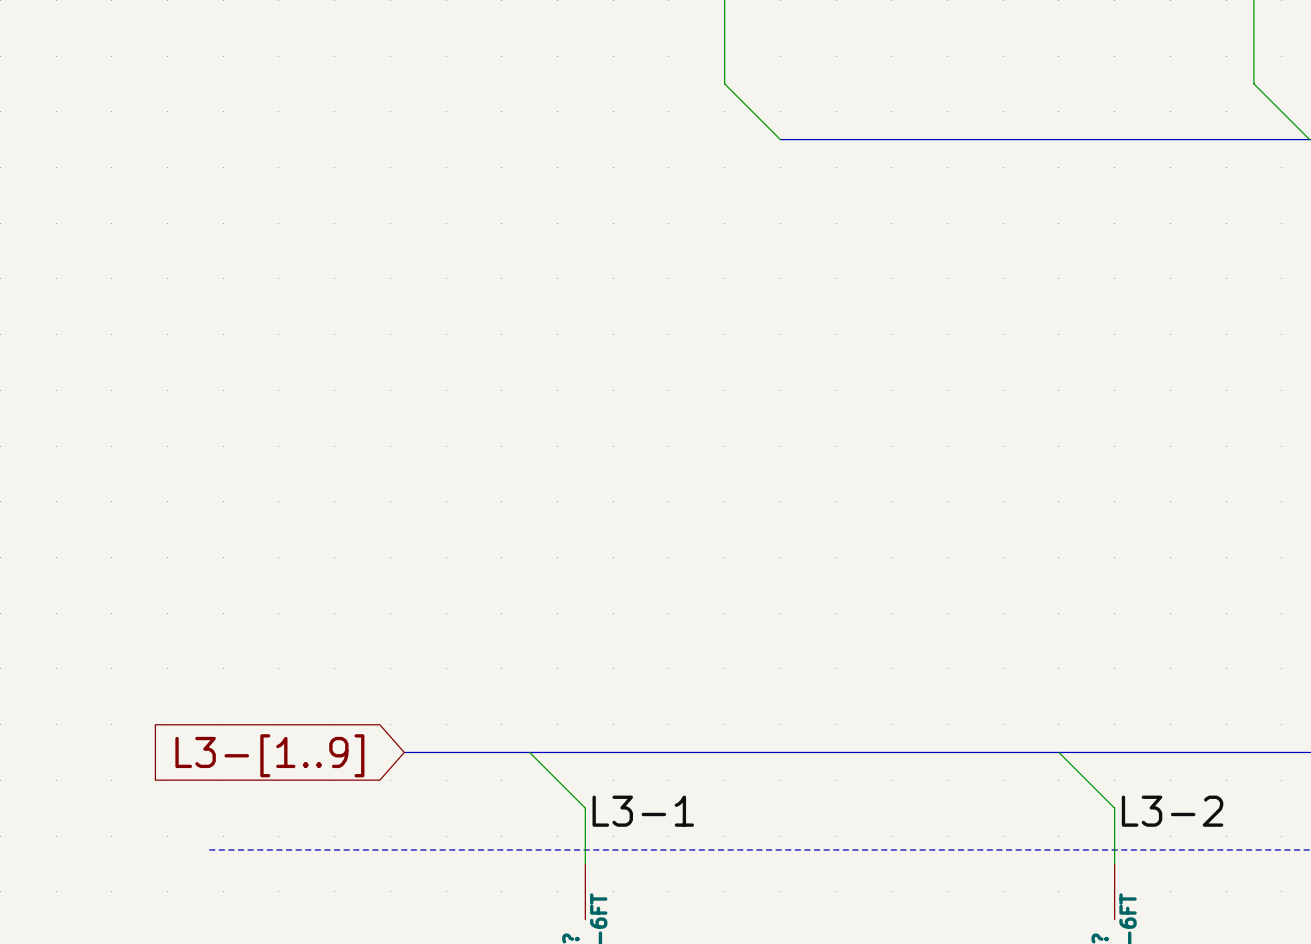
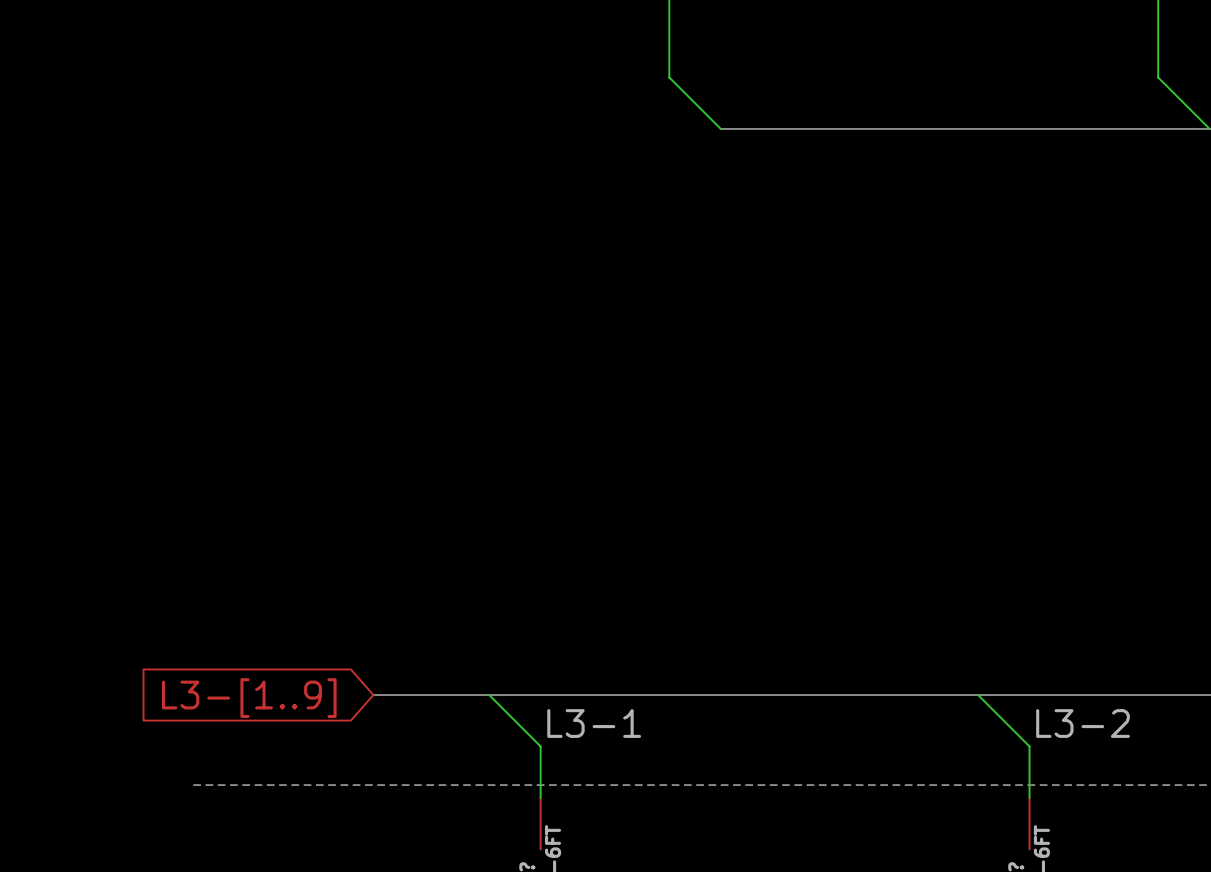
label position: L3-1 (643, 811) -> L3-1 (594, 723)
label position: L3-2 (1172, 811) -> L3-2 (1083, 723)

